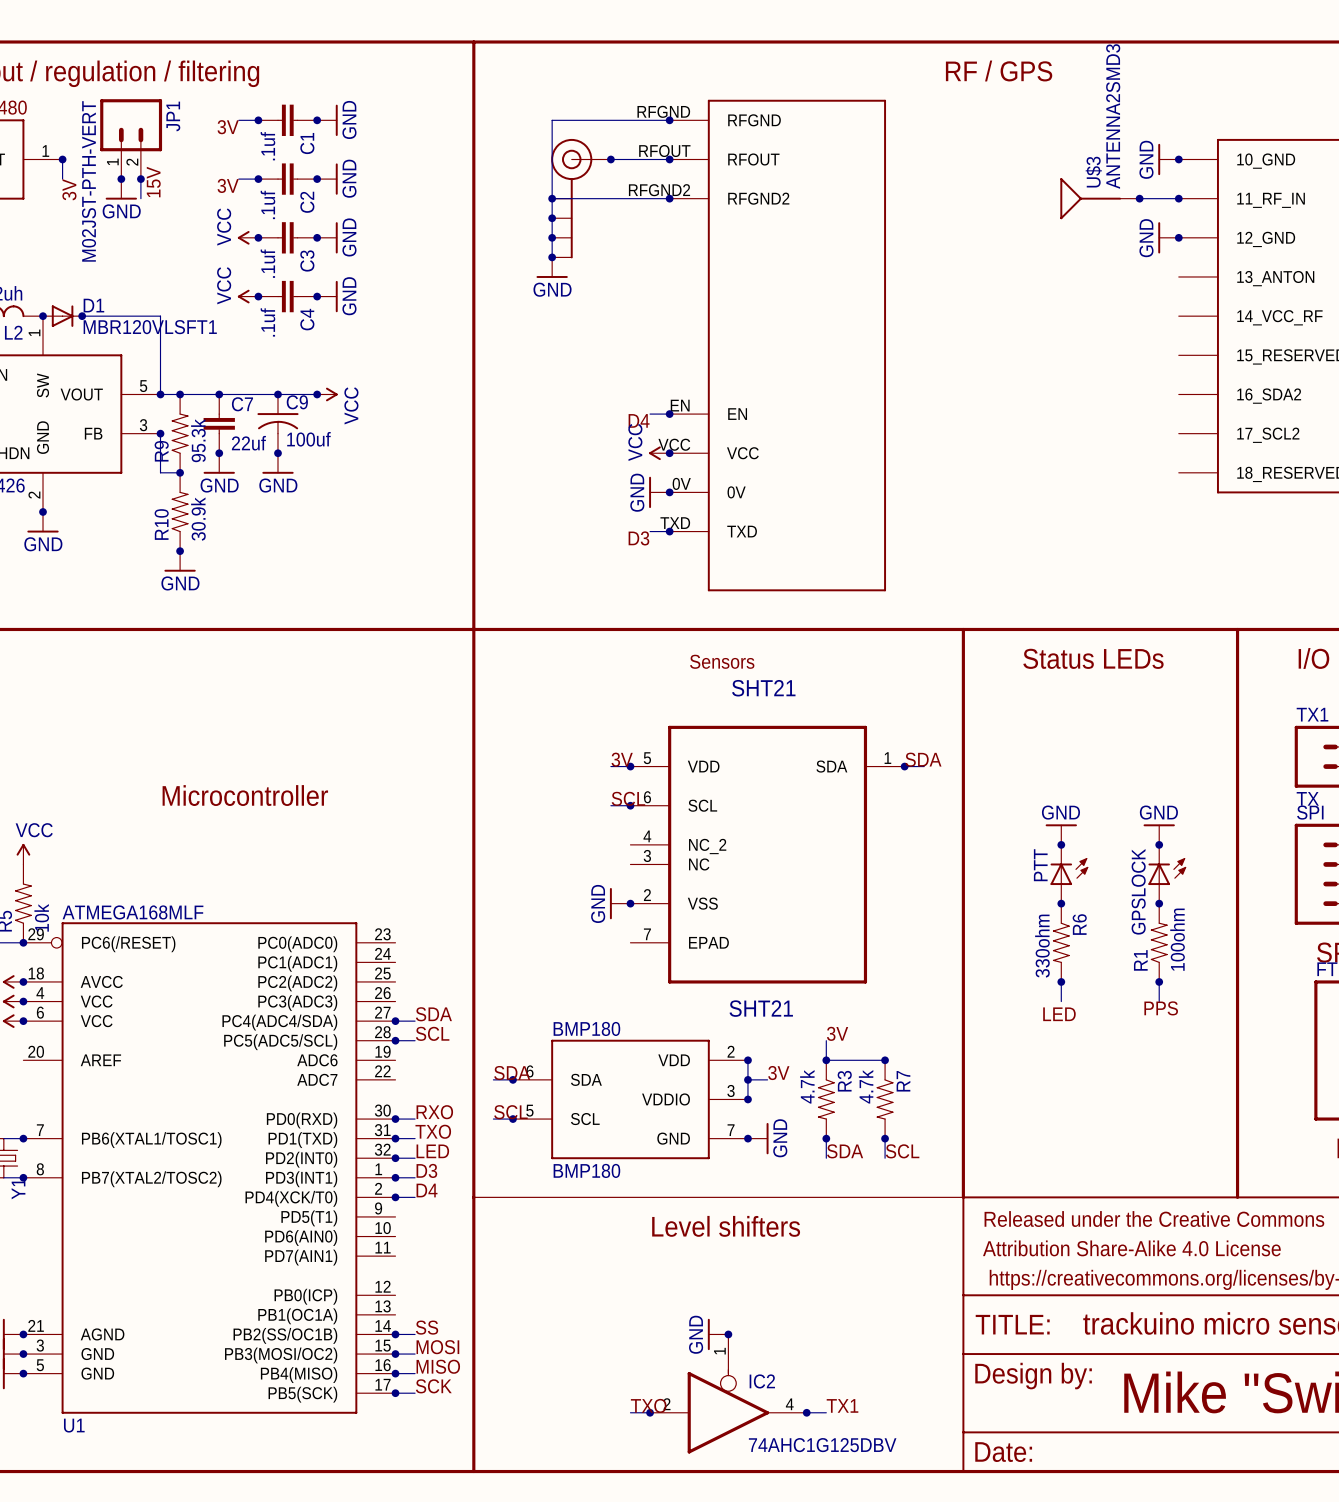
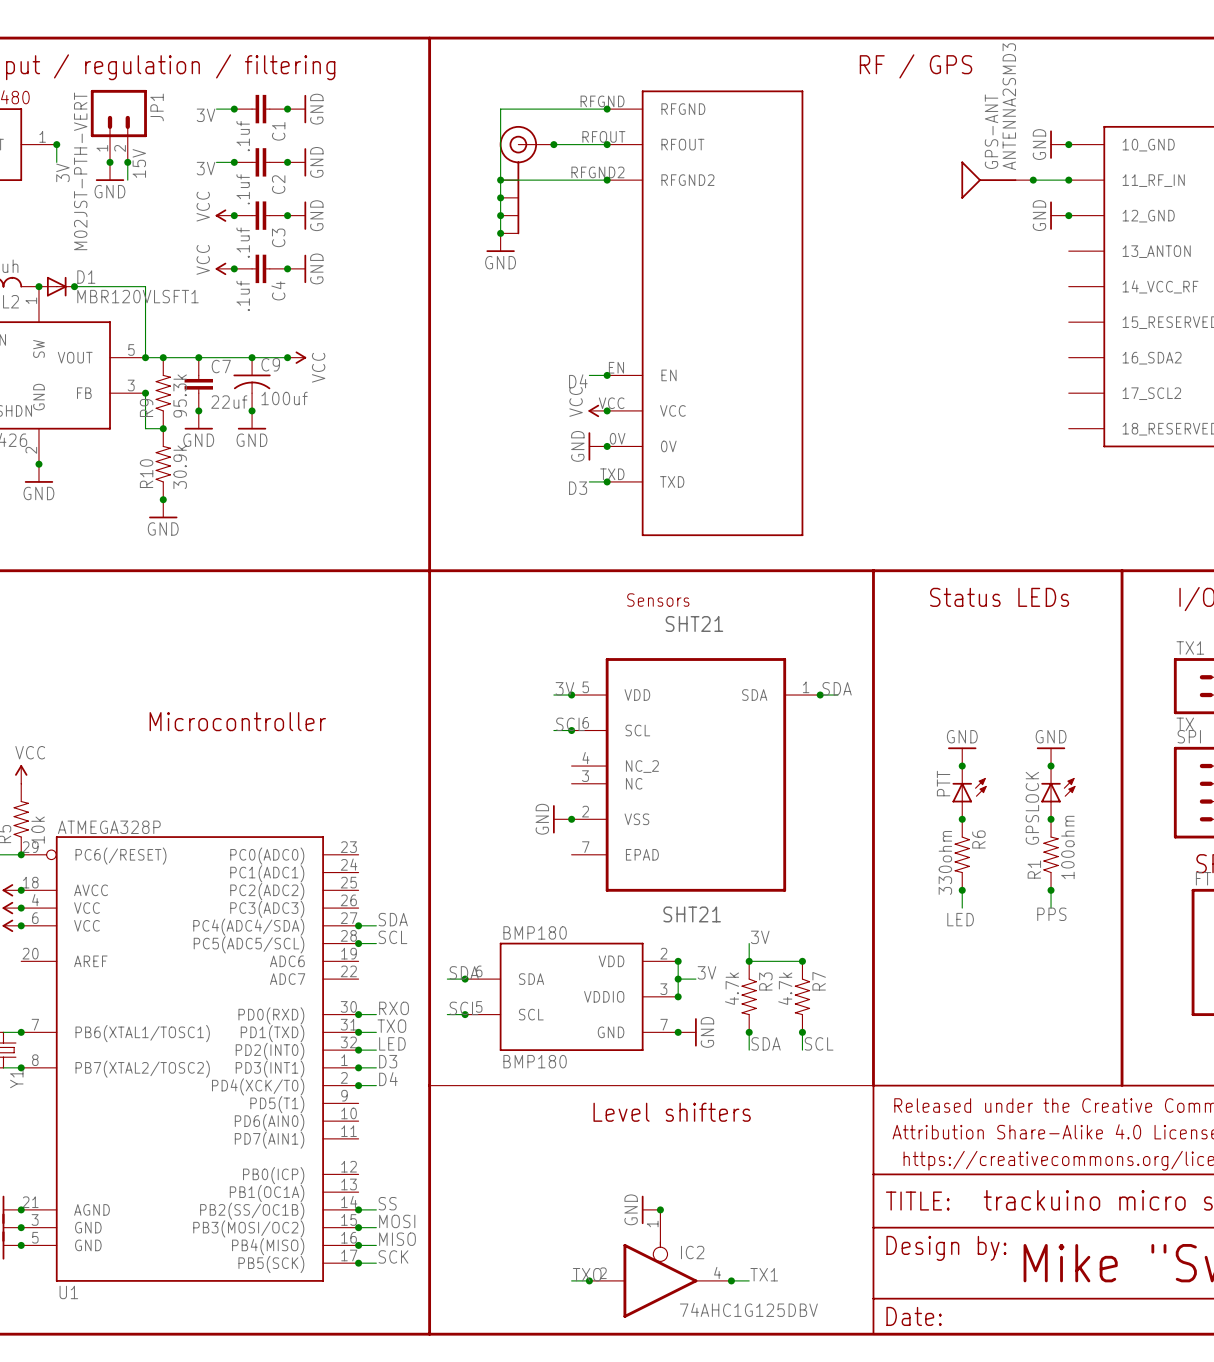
U$3 name: U$3 (1093, 172) -> GPS-ANT (991, 131)
U1 value: ATMEGA168MLF (133, 912) -> ATMEGA328P (109, 827)

